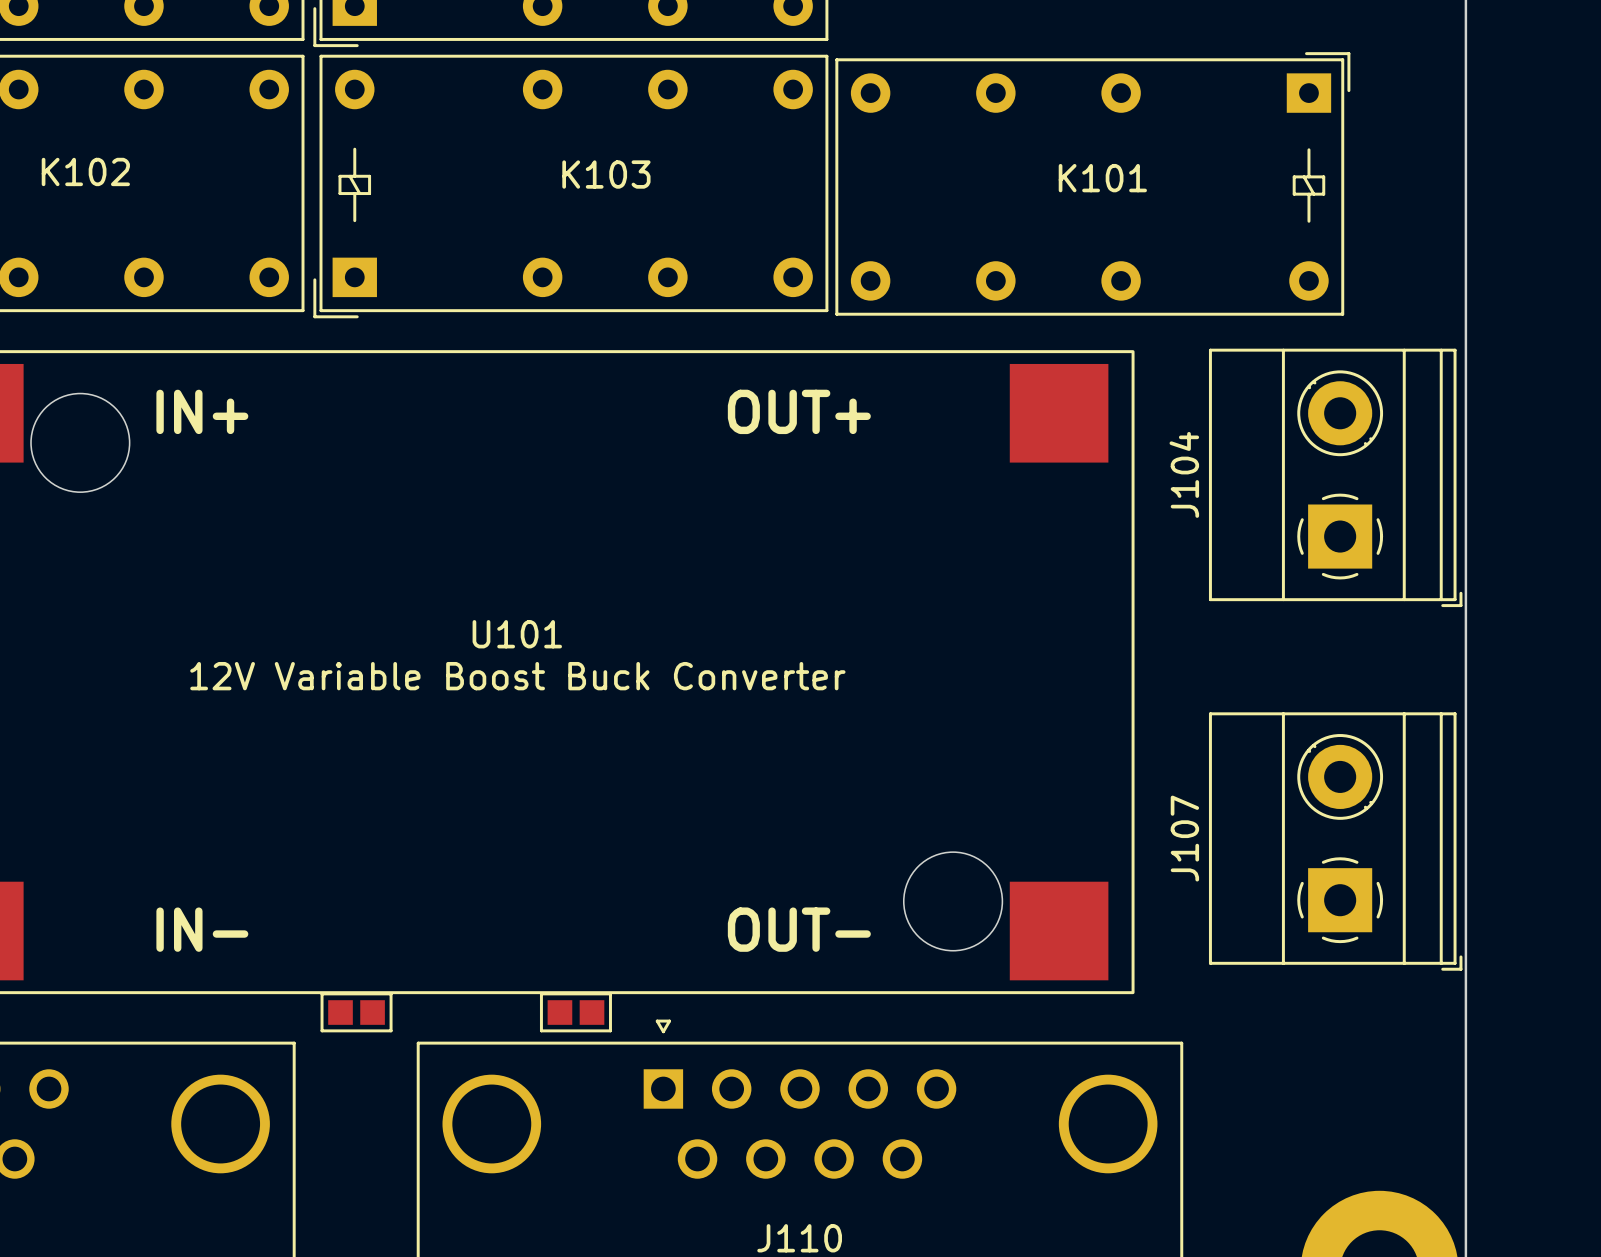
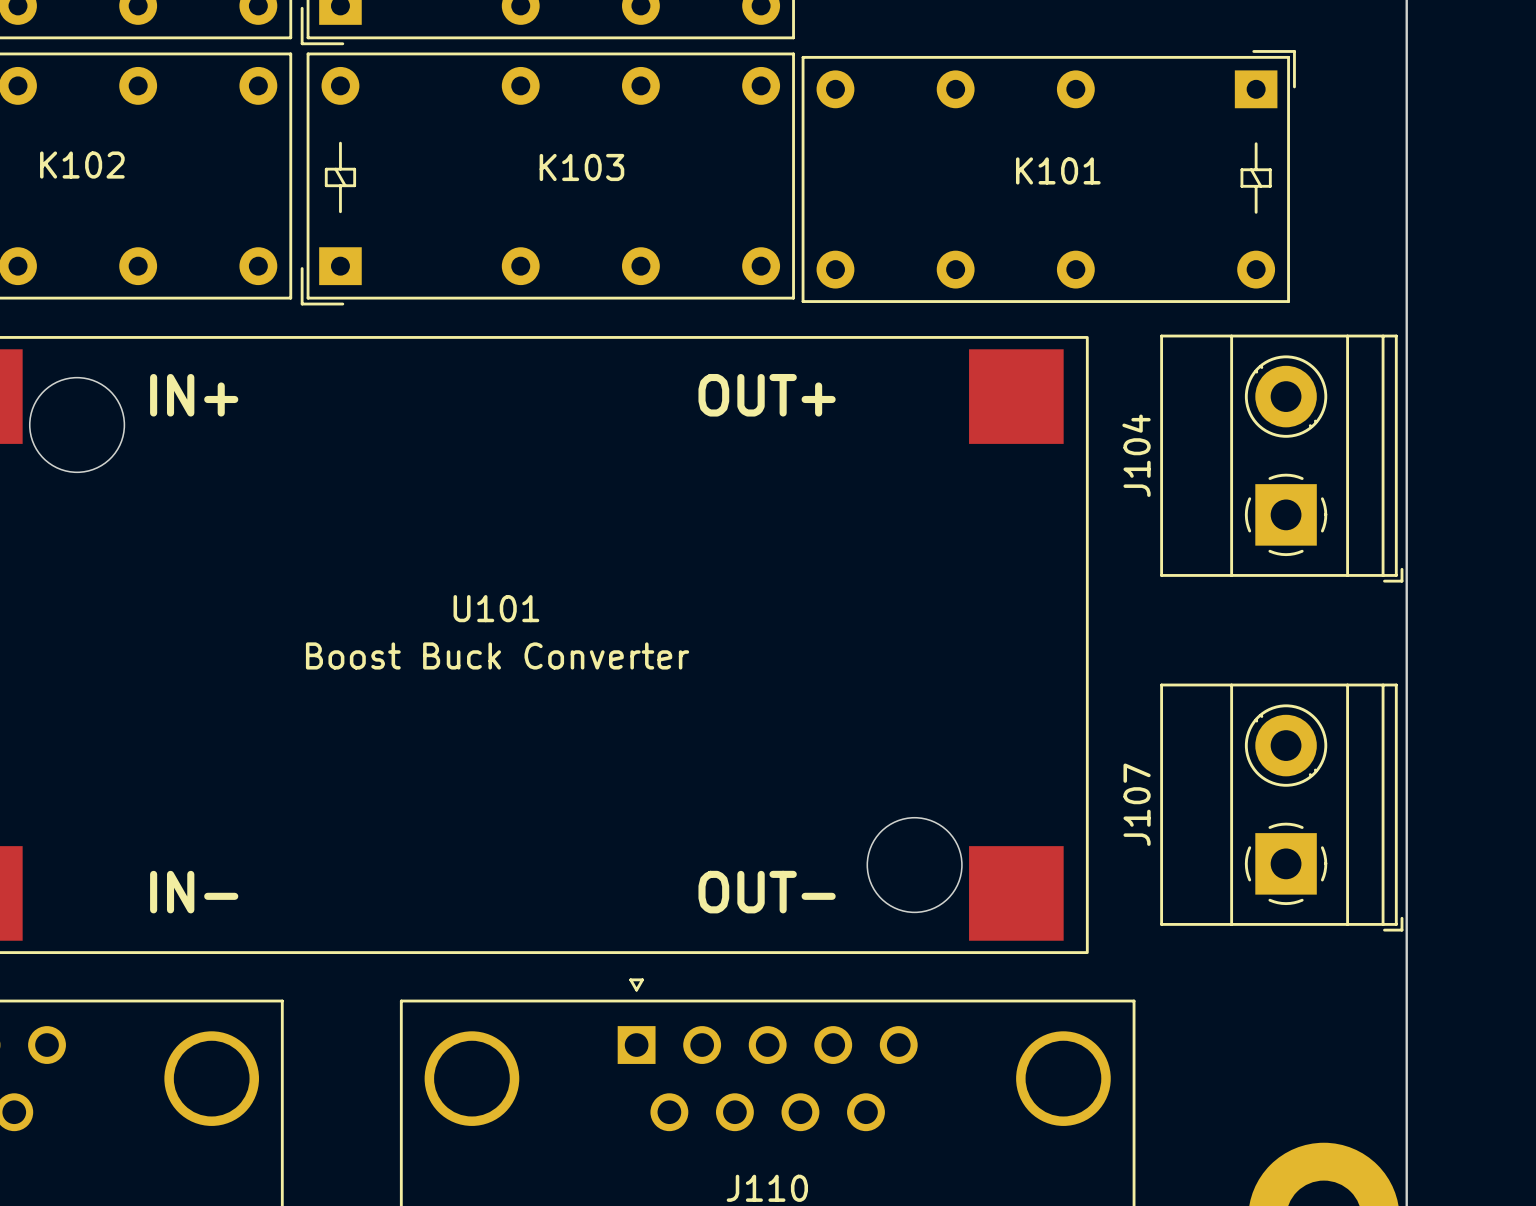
U101 value: 12V Variable Boost Buck Converter (517, 676) -> none
U101 text: none -> Boost Buck Converter (497, 655)
part: (356, 1012) -> none
part: (575, 1012) -> none

